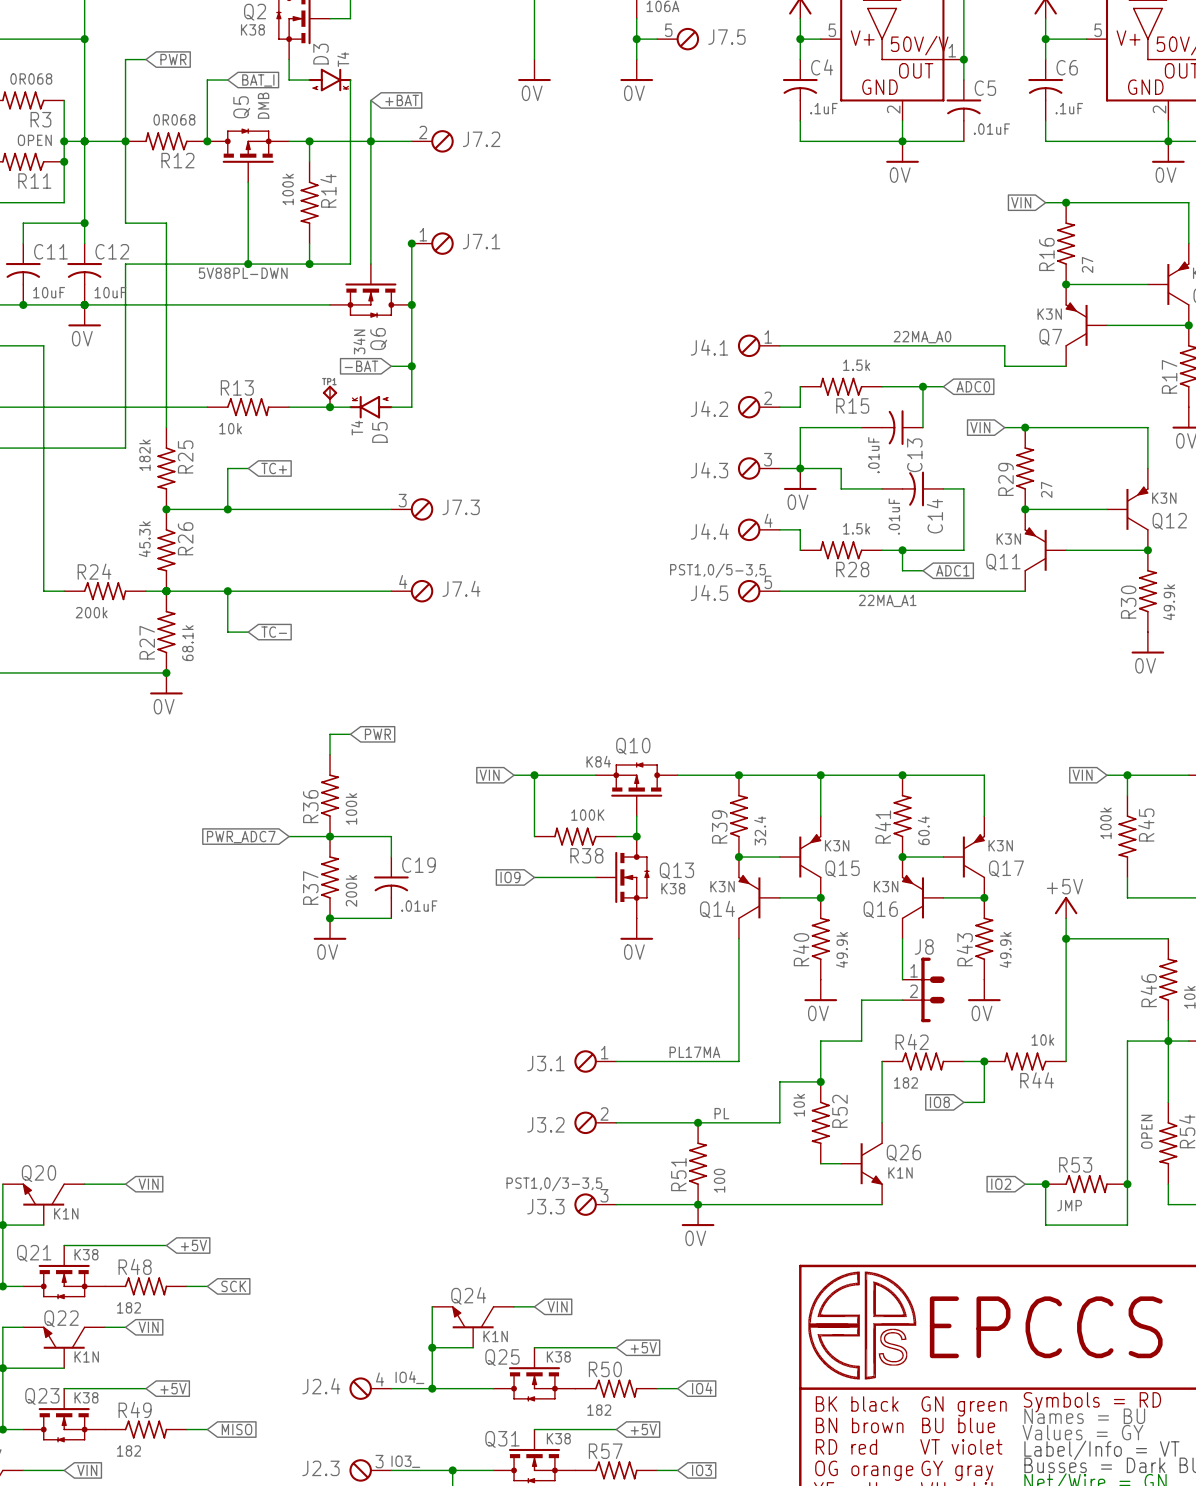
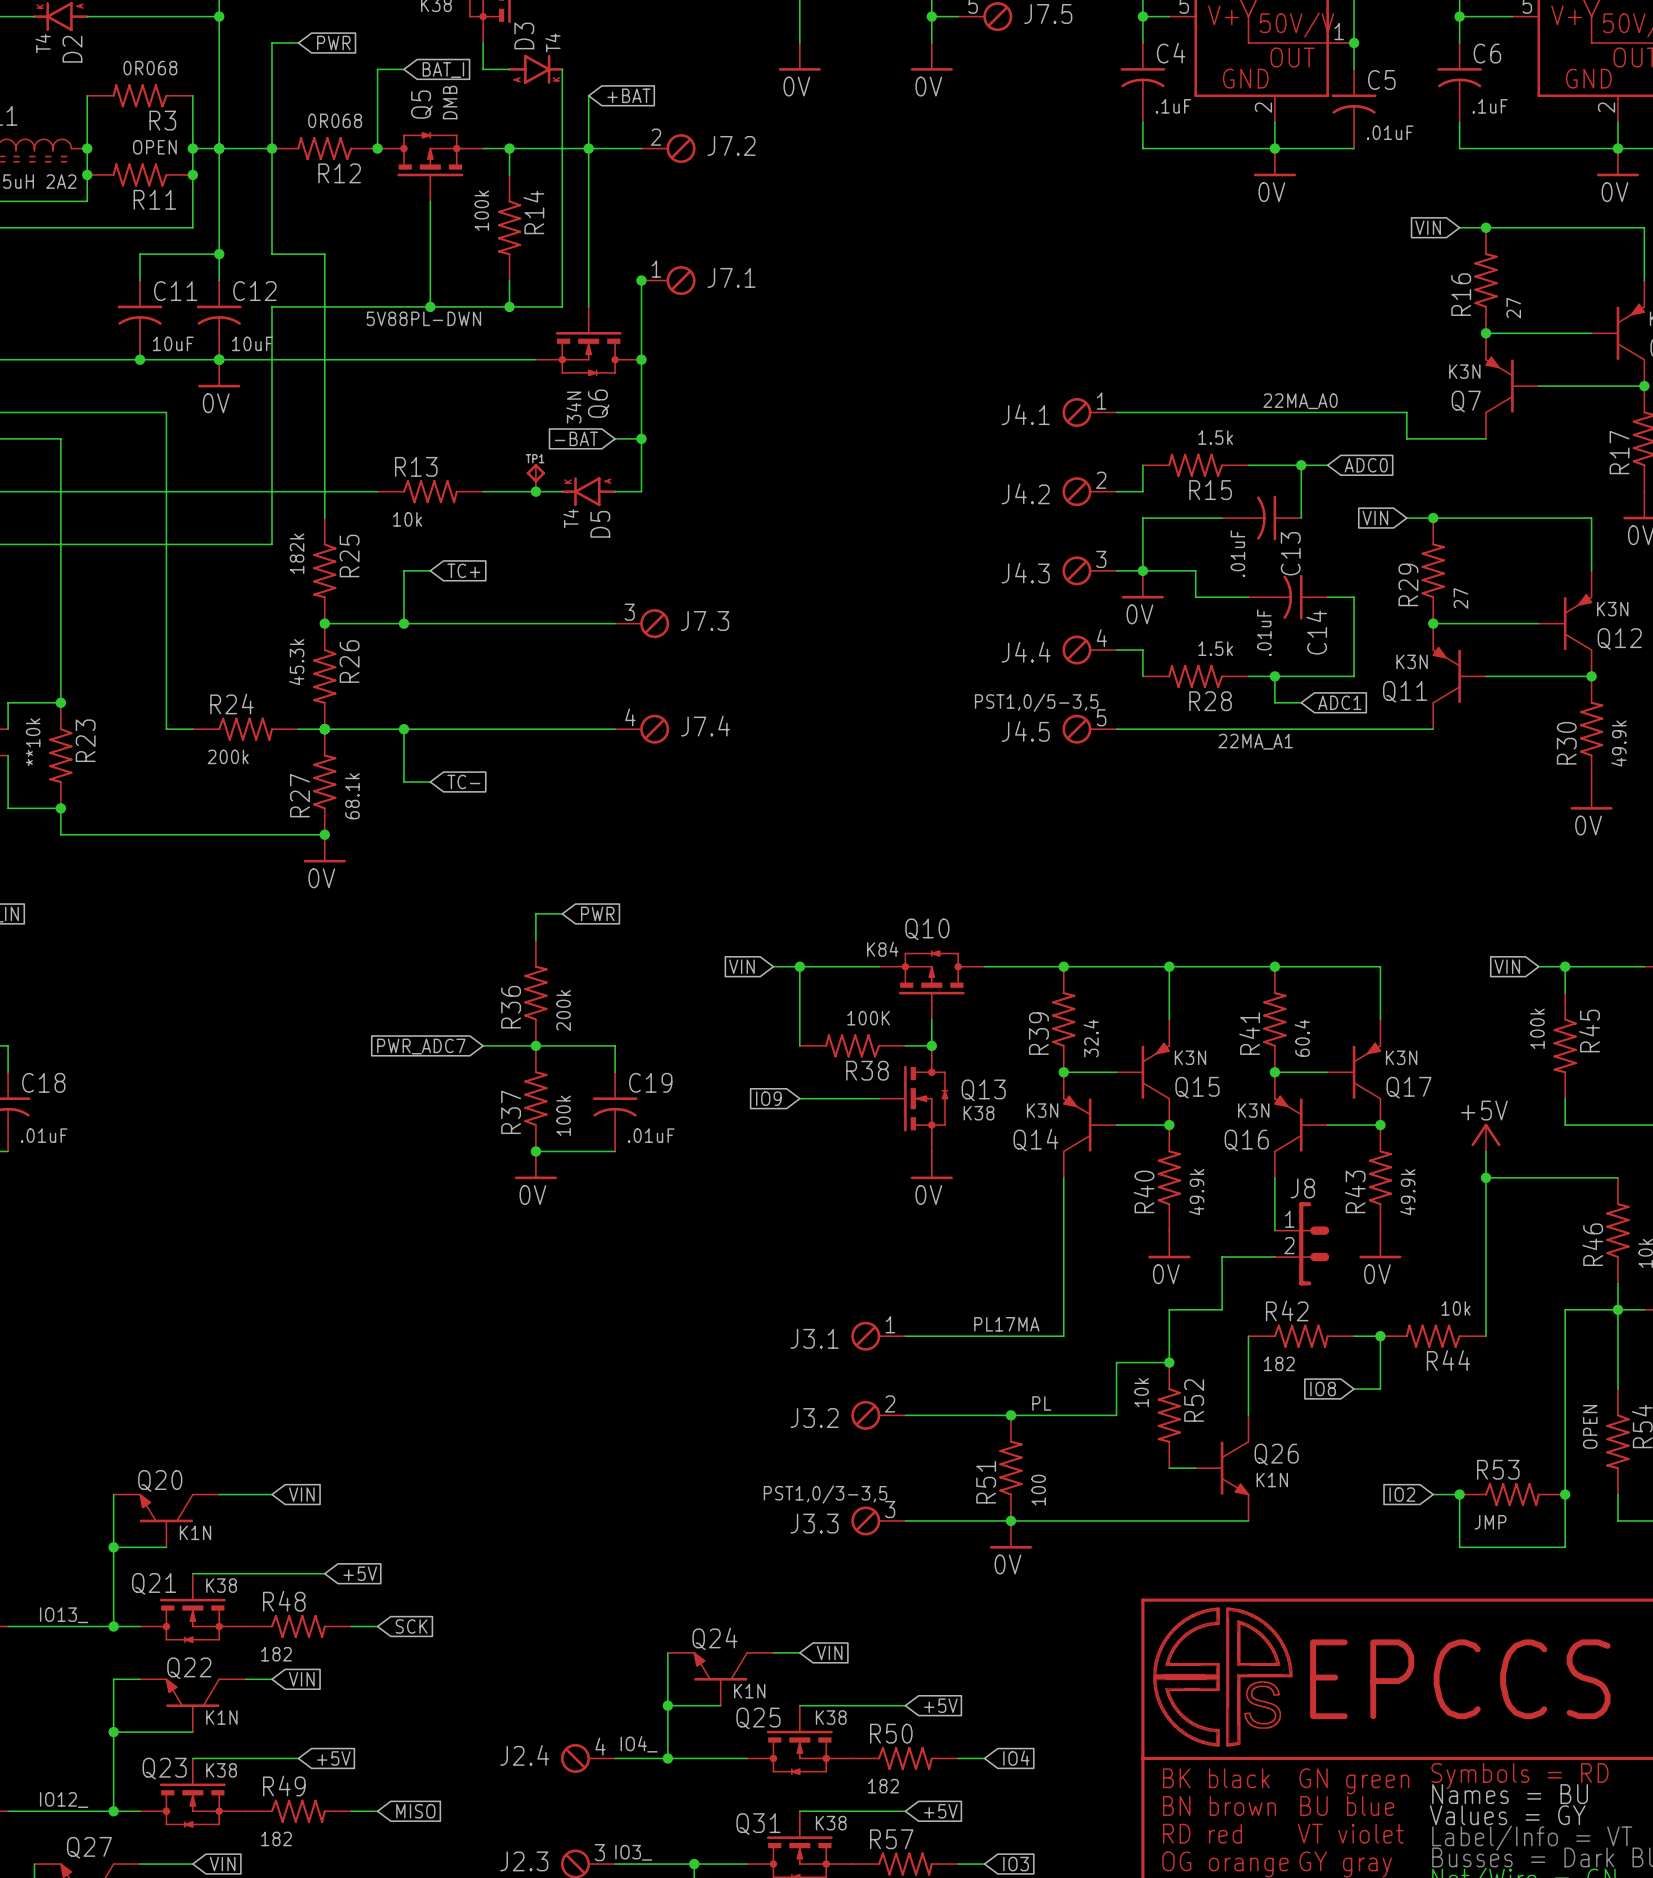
R36 value: 100k (351, 808) -> 200k (563, 1010)
R37 value: 200k (351, 890) -> 100k (563, 1115)

